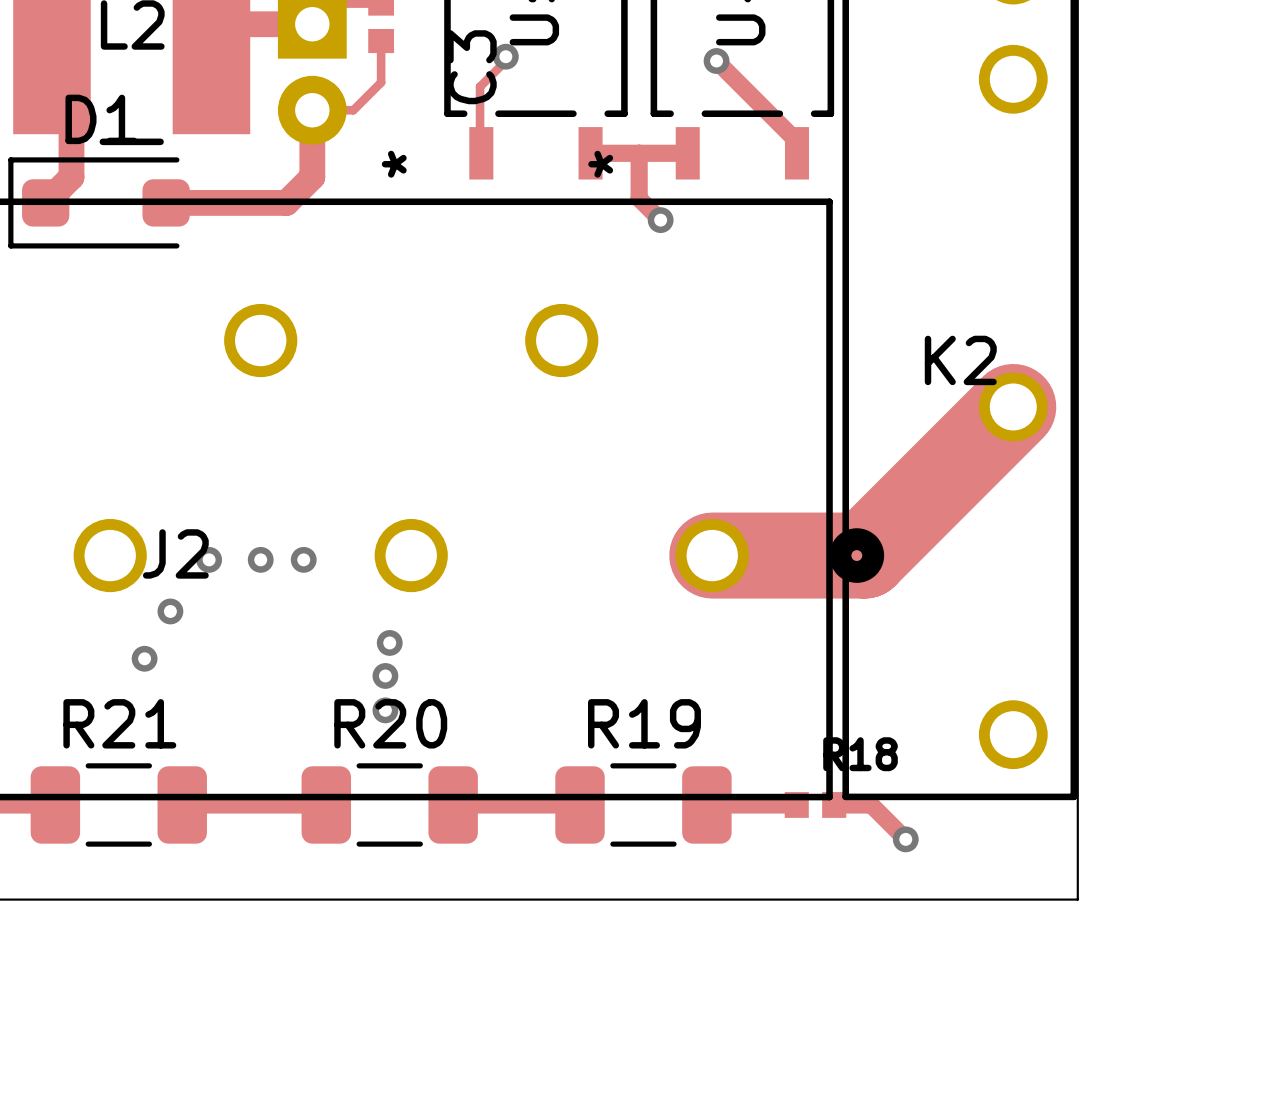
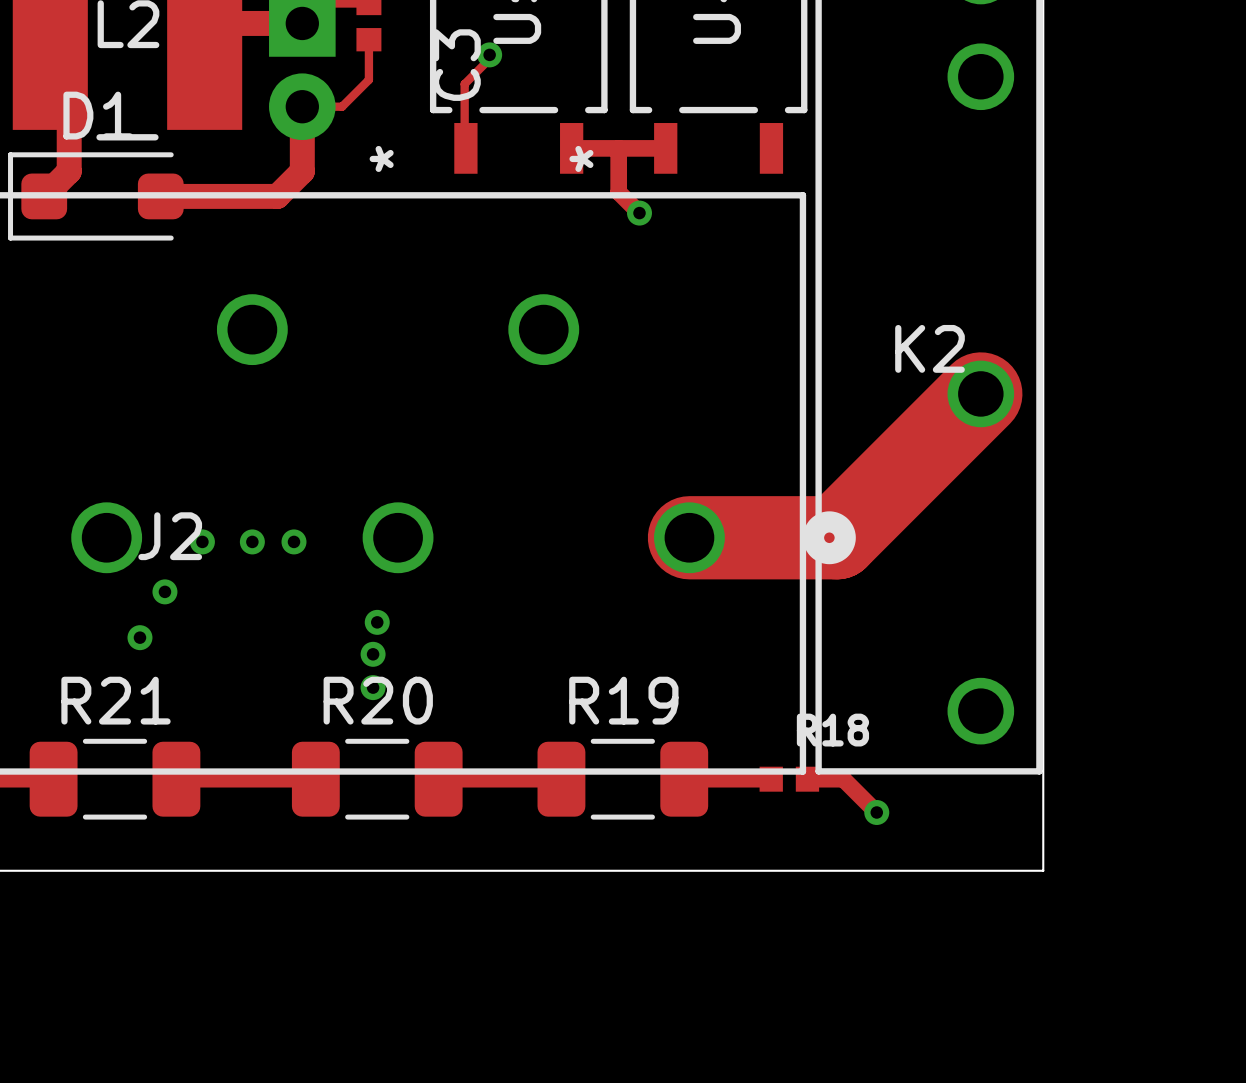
track: (716, 61) (796, 141) (796, 153) -> none
via: (716, 61) -> none

